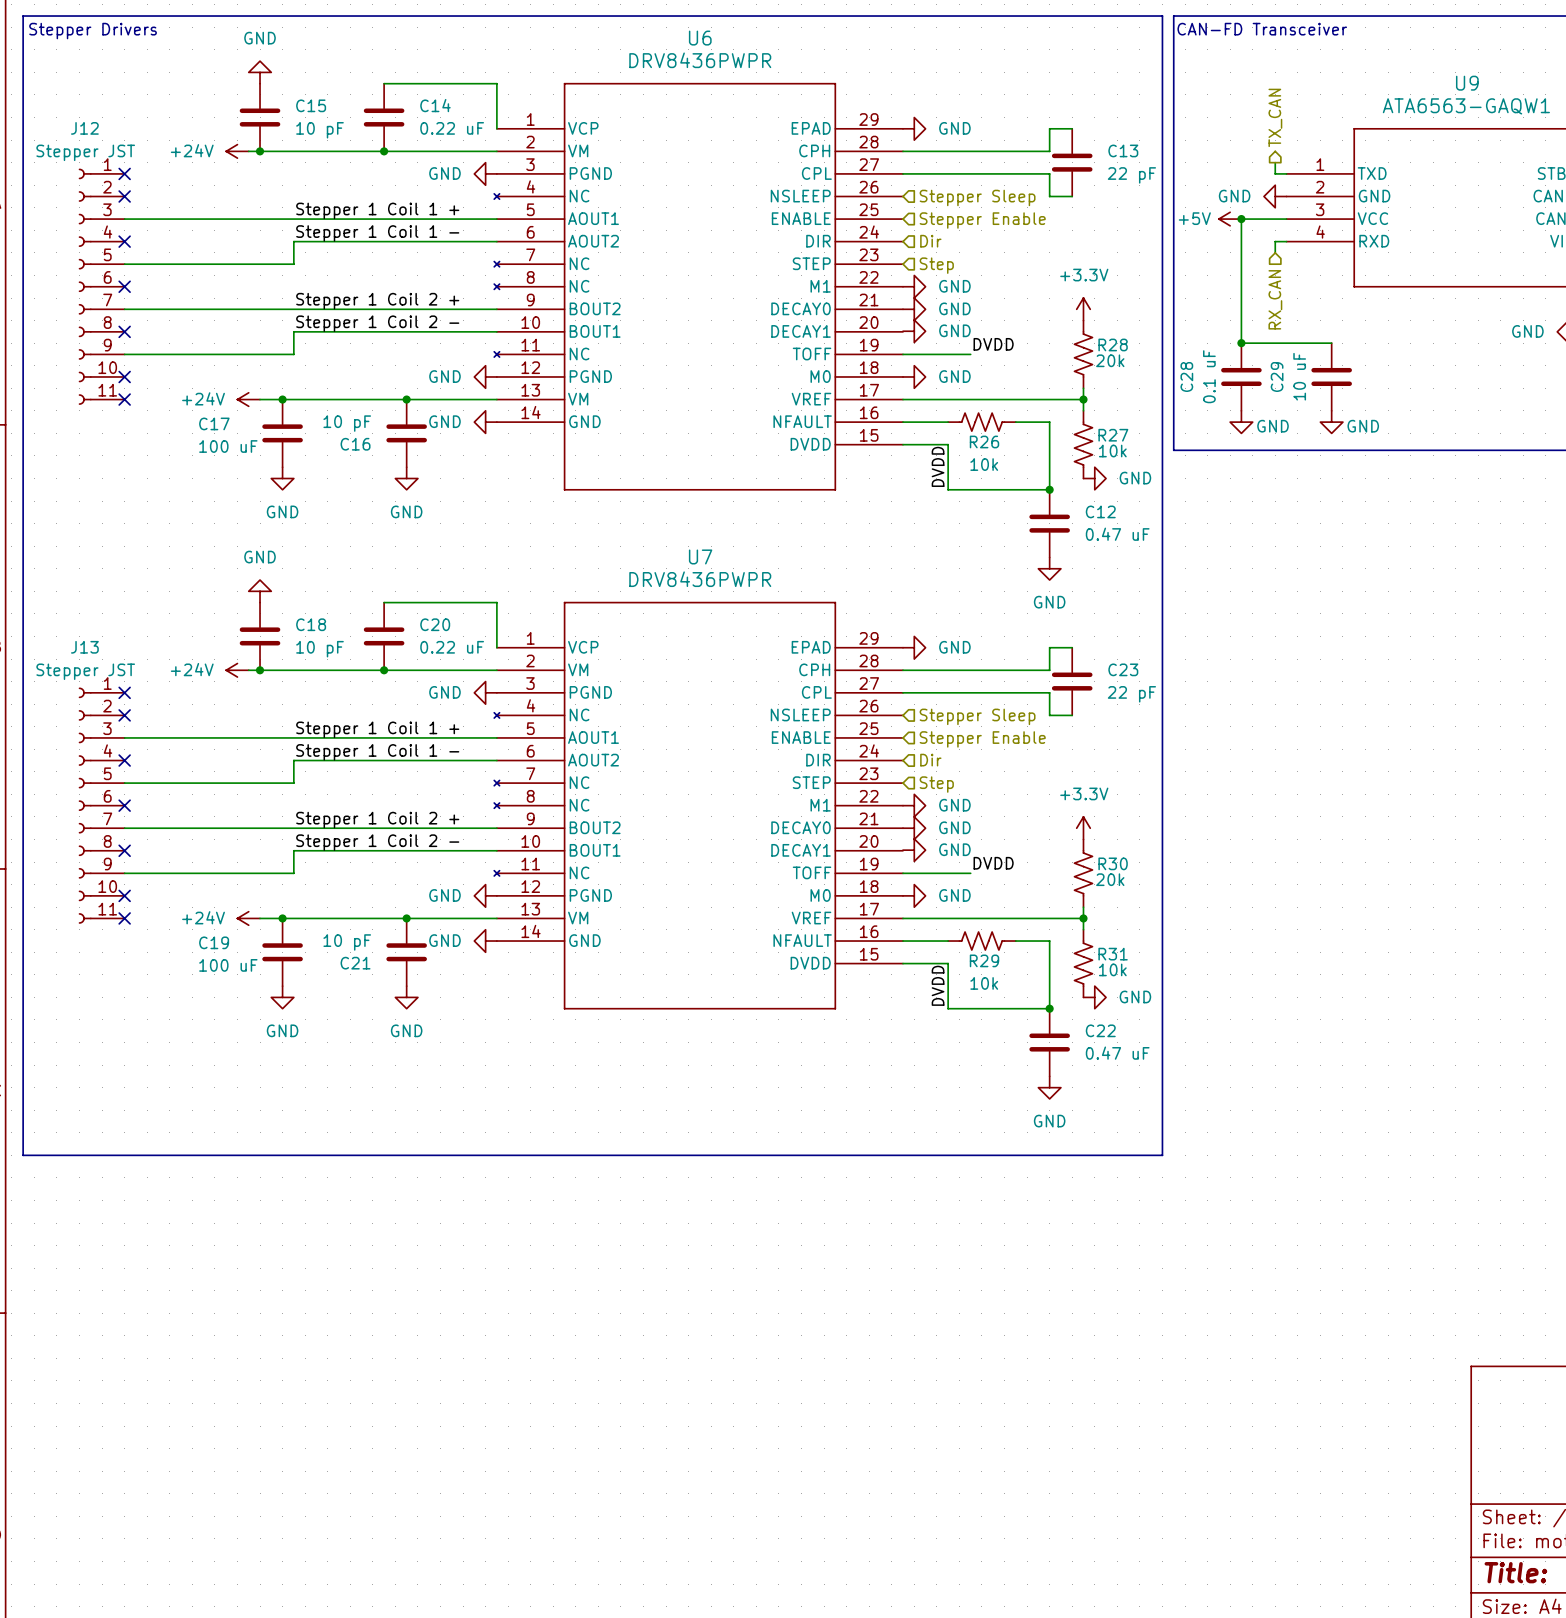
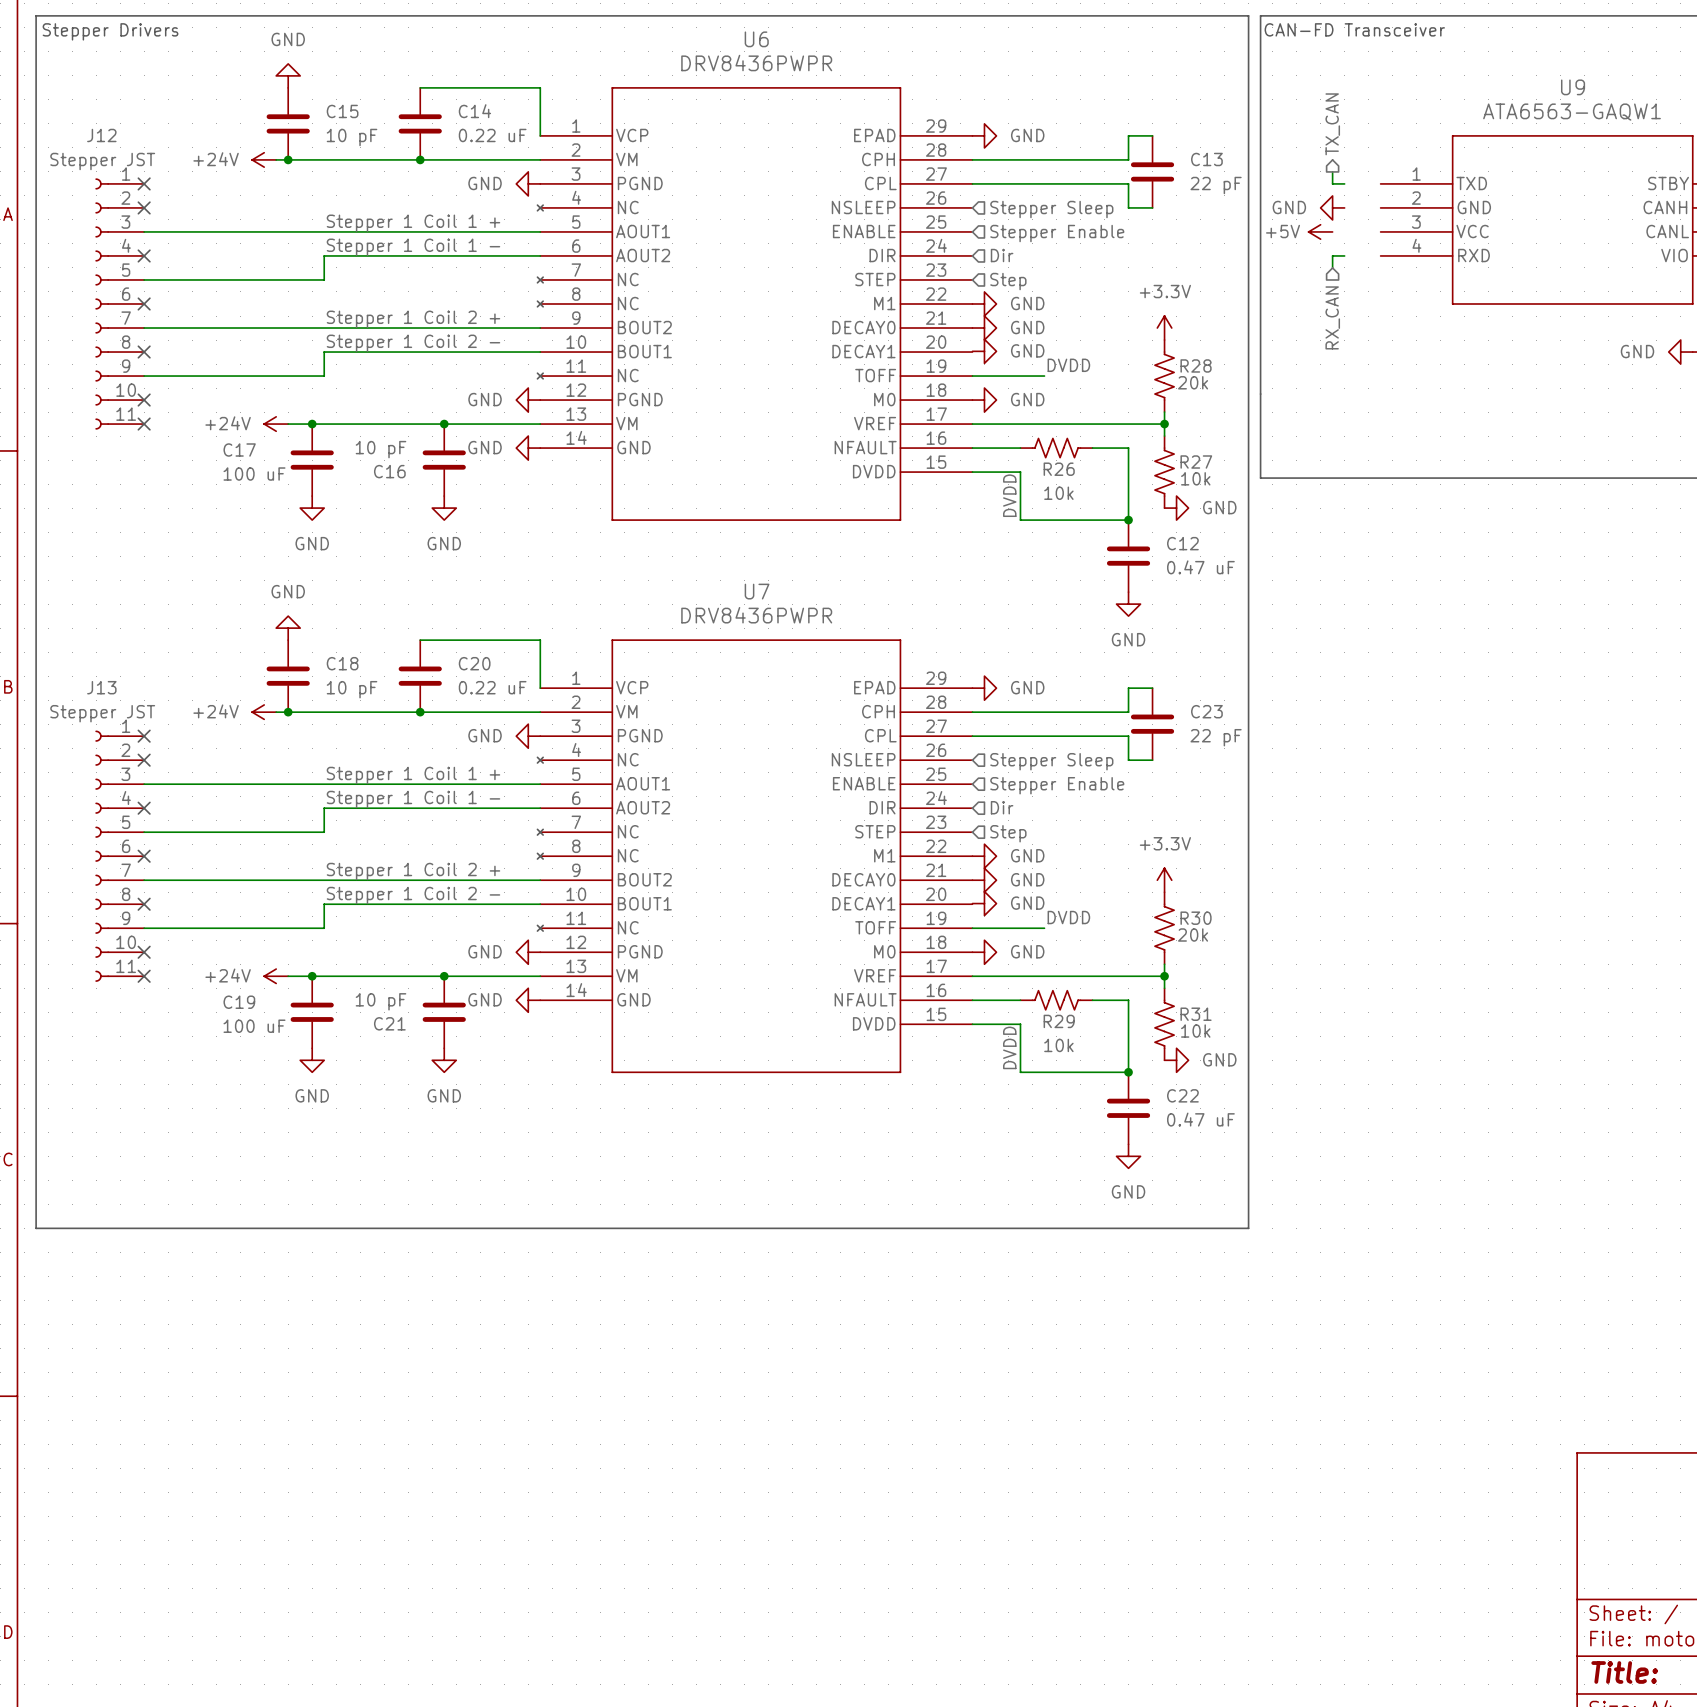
hierarchical label position: TX_CAN (1275, 117) -> TX_CAN (1332, 124)
wire: (1275, 162) (1275, 173) (1286, 173) -> (1332, 171) (1332, 183) (1344, 183)
power symbol position: GND (1275, 196) -> GND (1332, 207)
junction: (1241, 219) -> none
wire: (1286, 219) (1241, 219) (1241, 241) -> (1344, 255) (1332, 255)
wire: (1286, 241) (1275, 241) (1275, 252) -> none
wire: (1241, 252) (1241, 343) (1331, 343) -> none
hierarchical label position: RX_CAN (1275, 299) -> RX_CAN (1332, 317)
junction: (1241, 343) -> none
C28: 0.1 uF (1241, 376) -> none
C29: 10 uF (1331, 376) -> none
power symbol: GND (1241, 422) -> none
power symbol: GND (1331, 422) -> none

